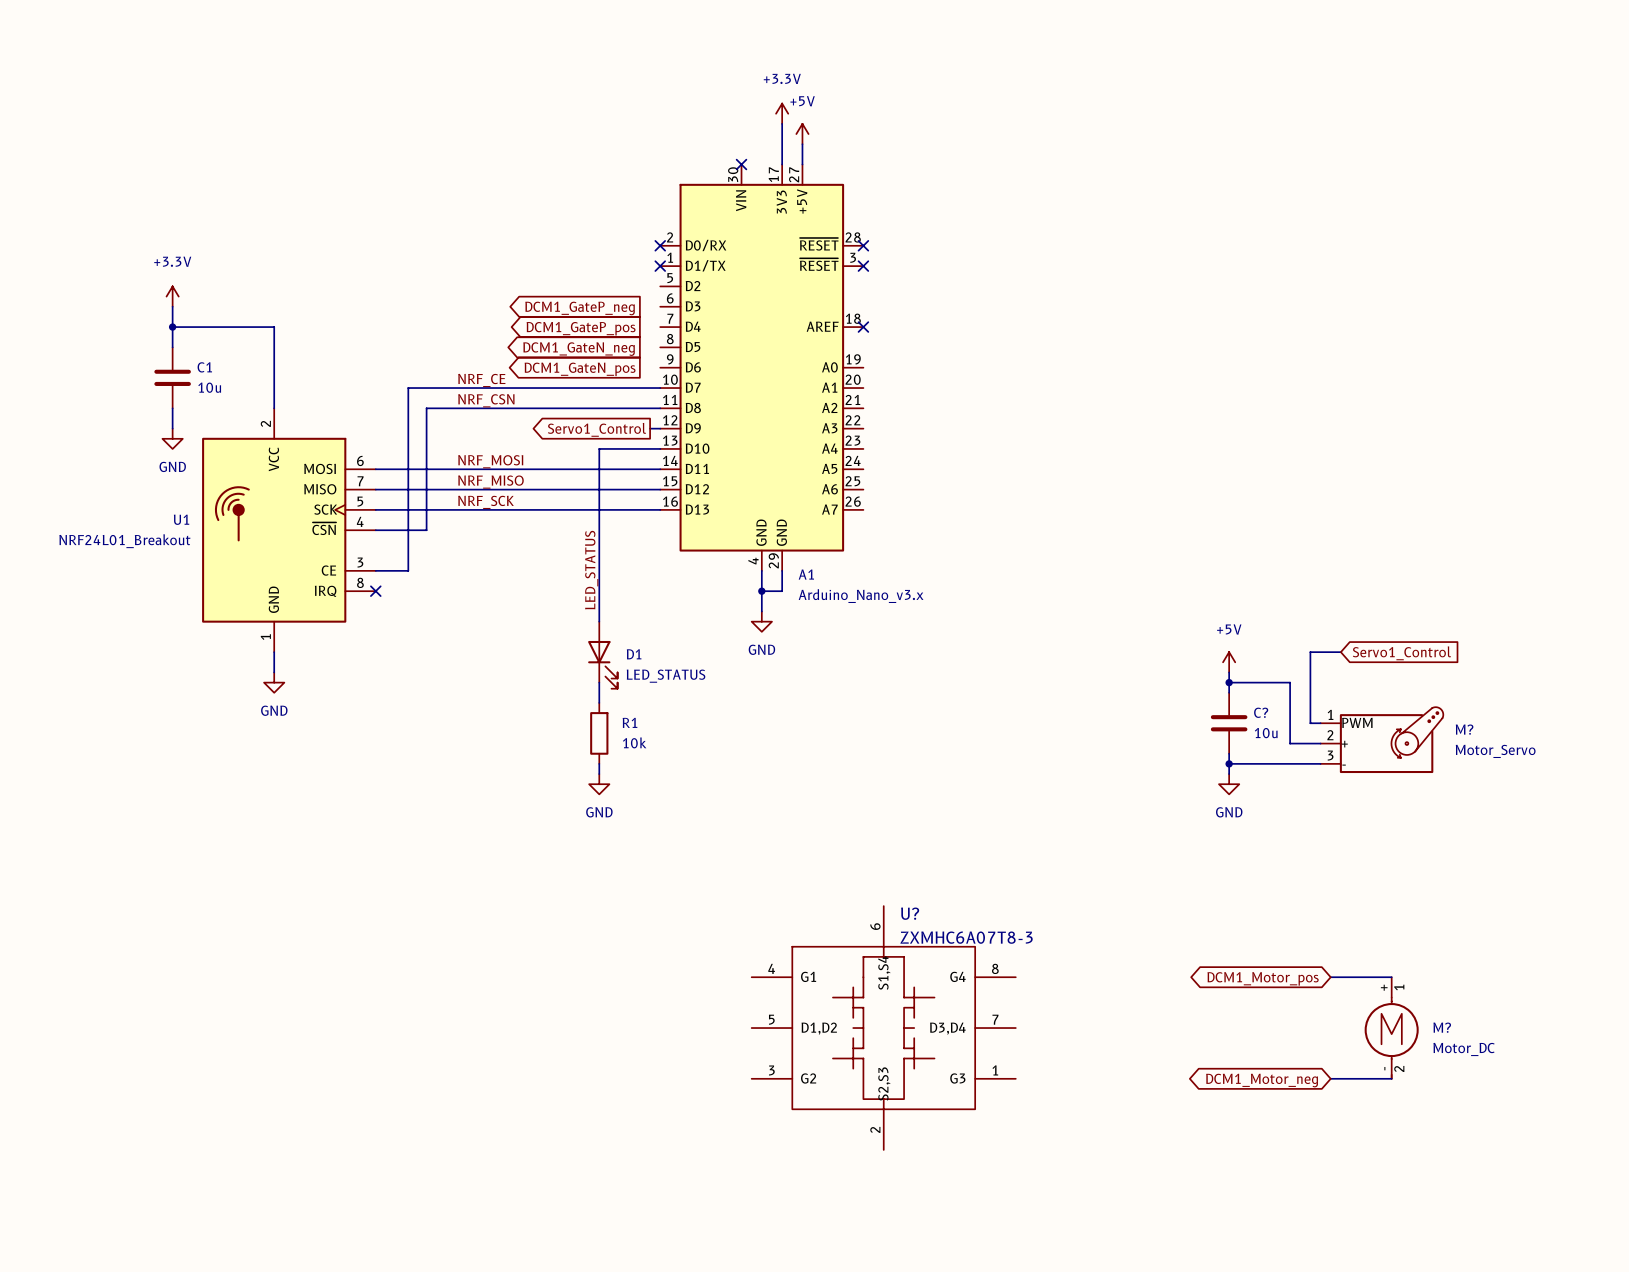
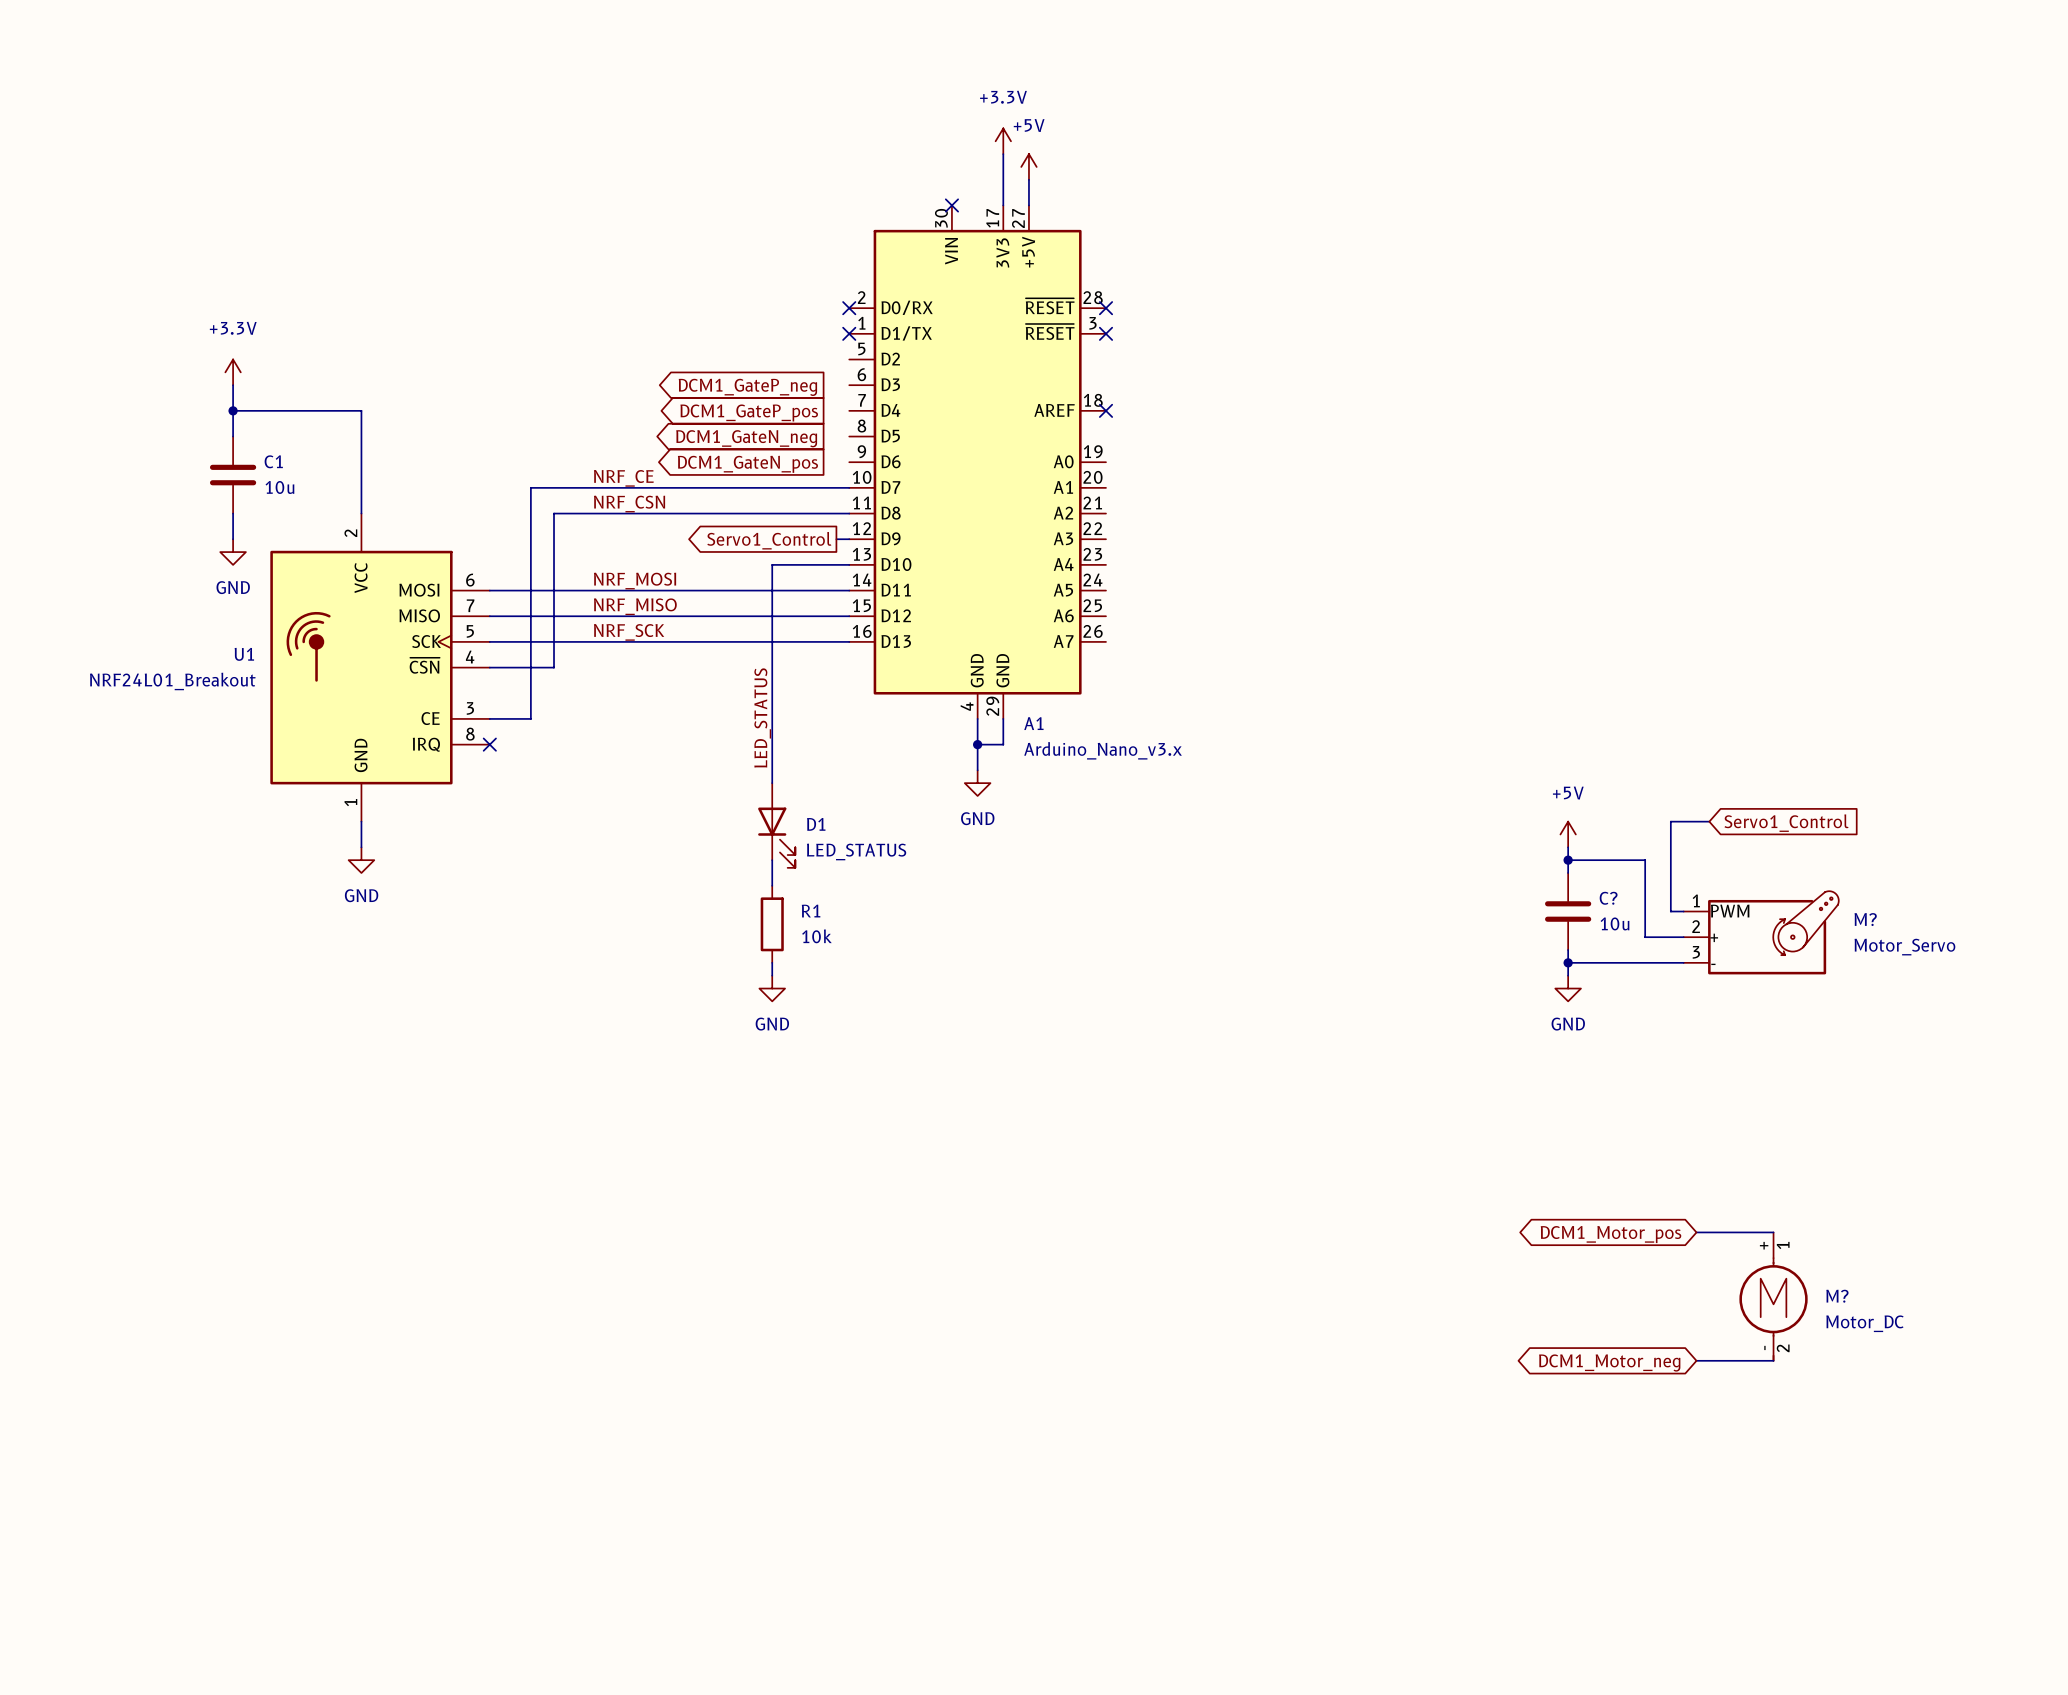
U?: ZXMHC6A07T8-3 (883, 1028) -> none

